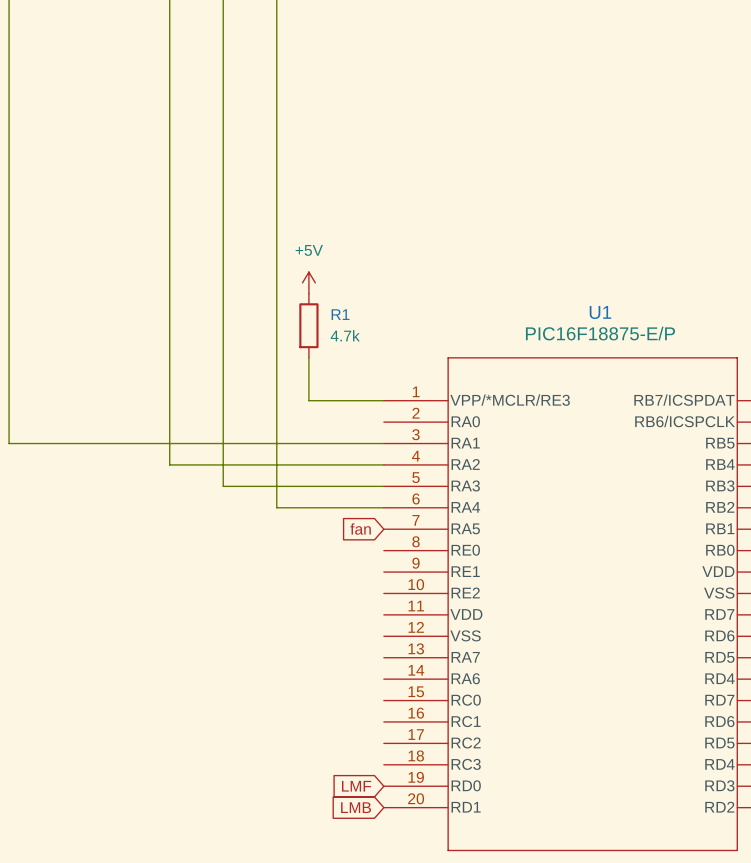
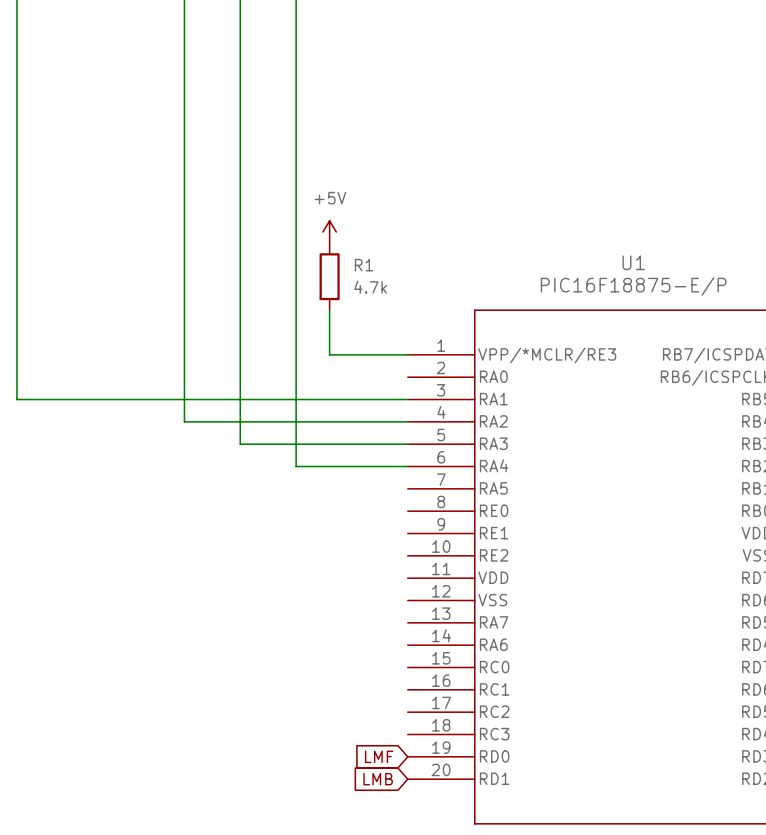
global label: fan (360, 529) -> none

